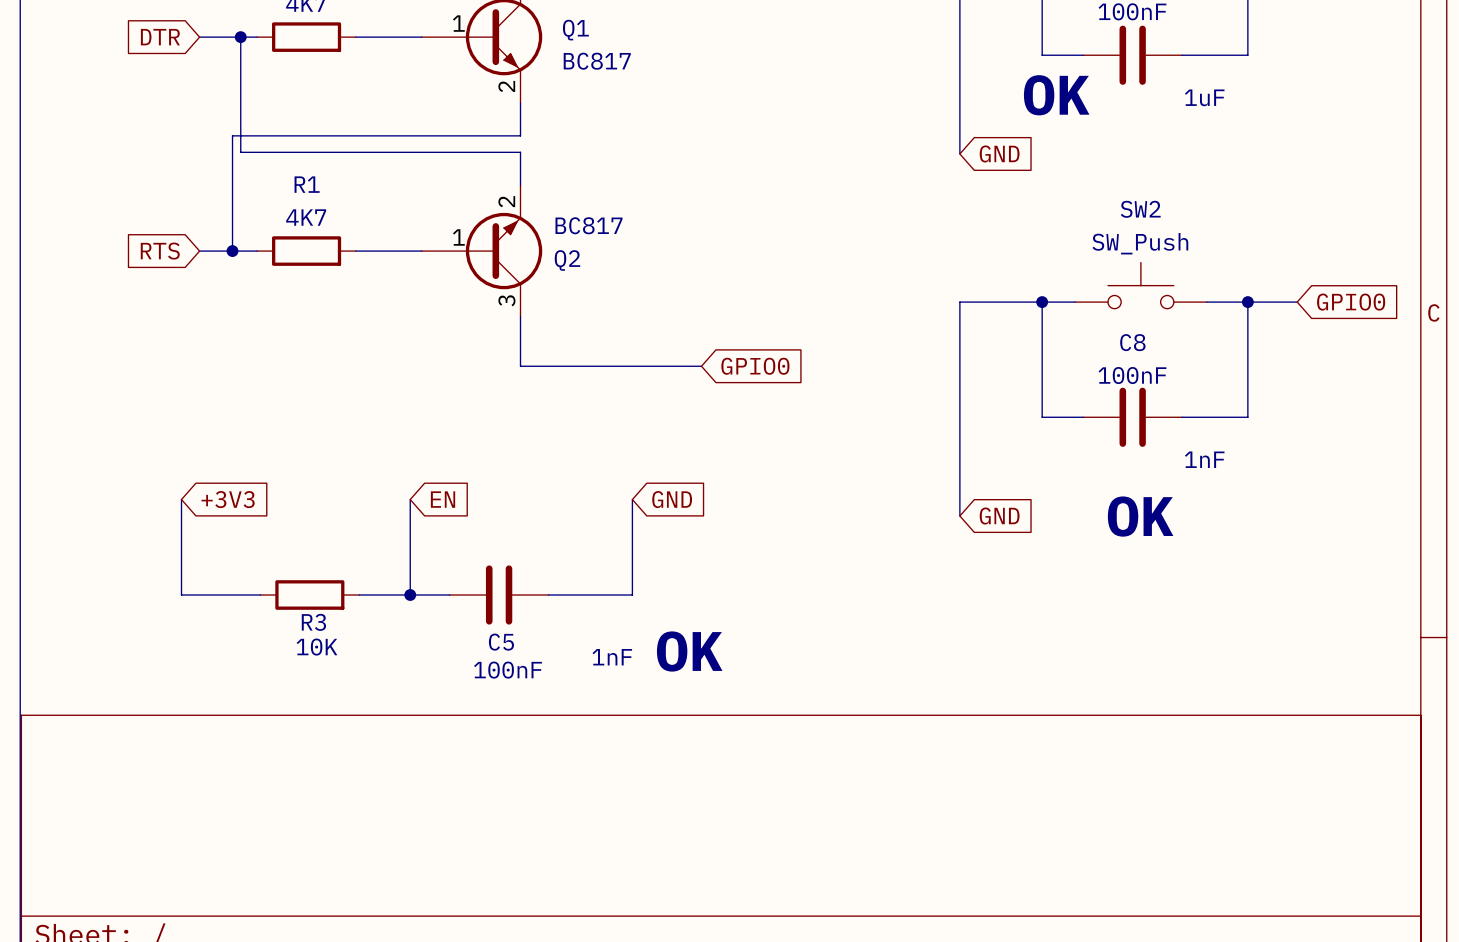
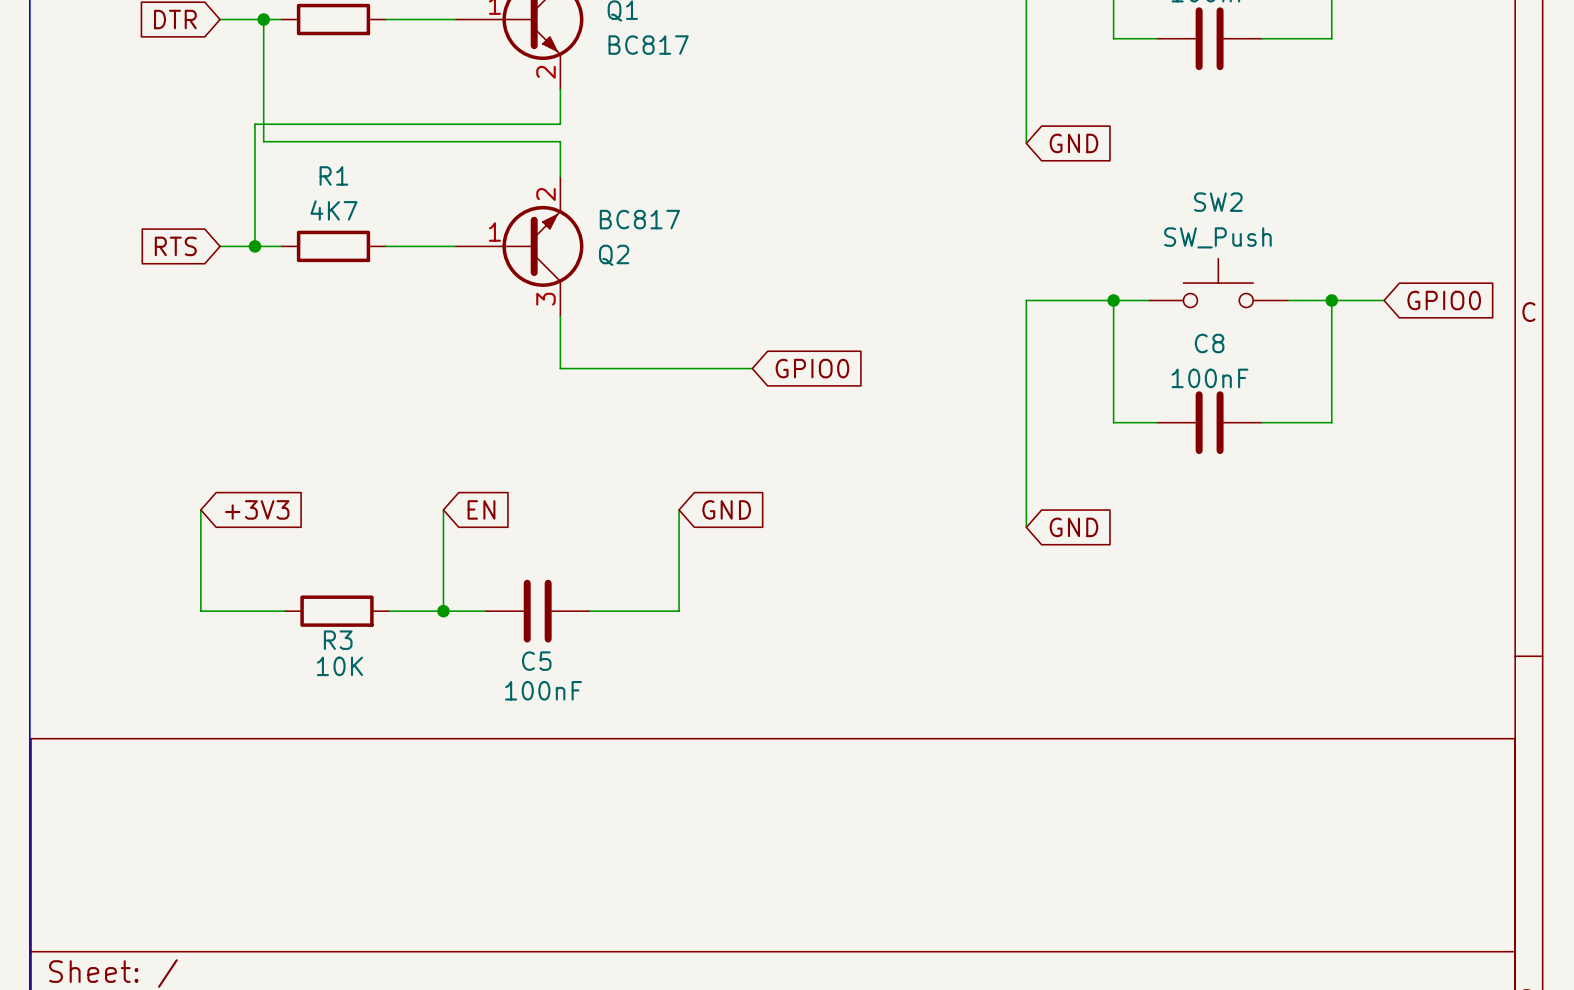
text: OK (1056, 95) -> none
text: 1uF (1204, 97) -> none
text: 1nF (1204, 459) -> none
text: OK (1140, 516) -> none
text: OK (689, 651) -> none
text: 1nF (612, 657) -> none

